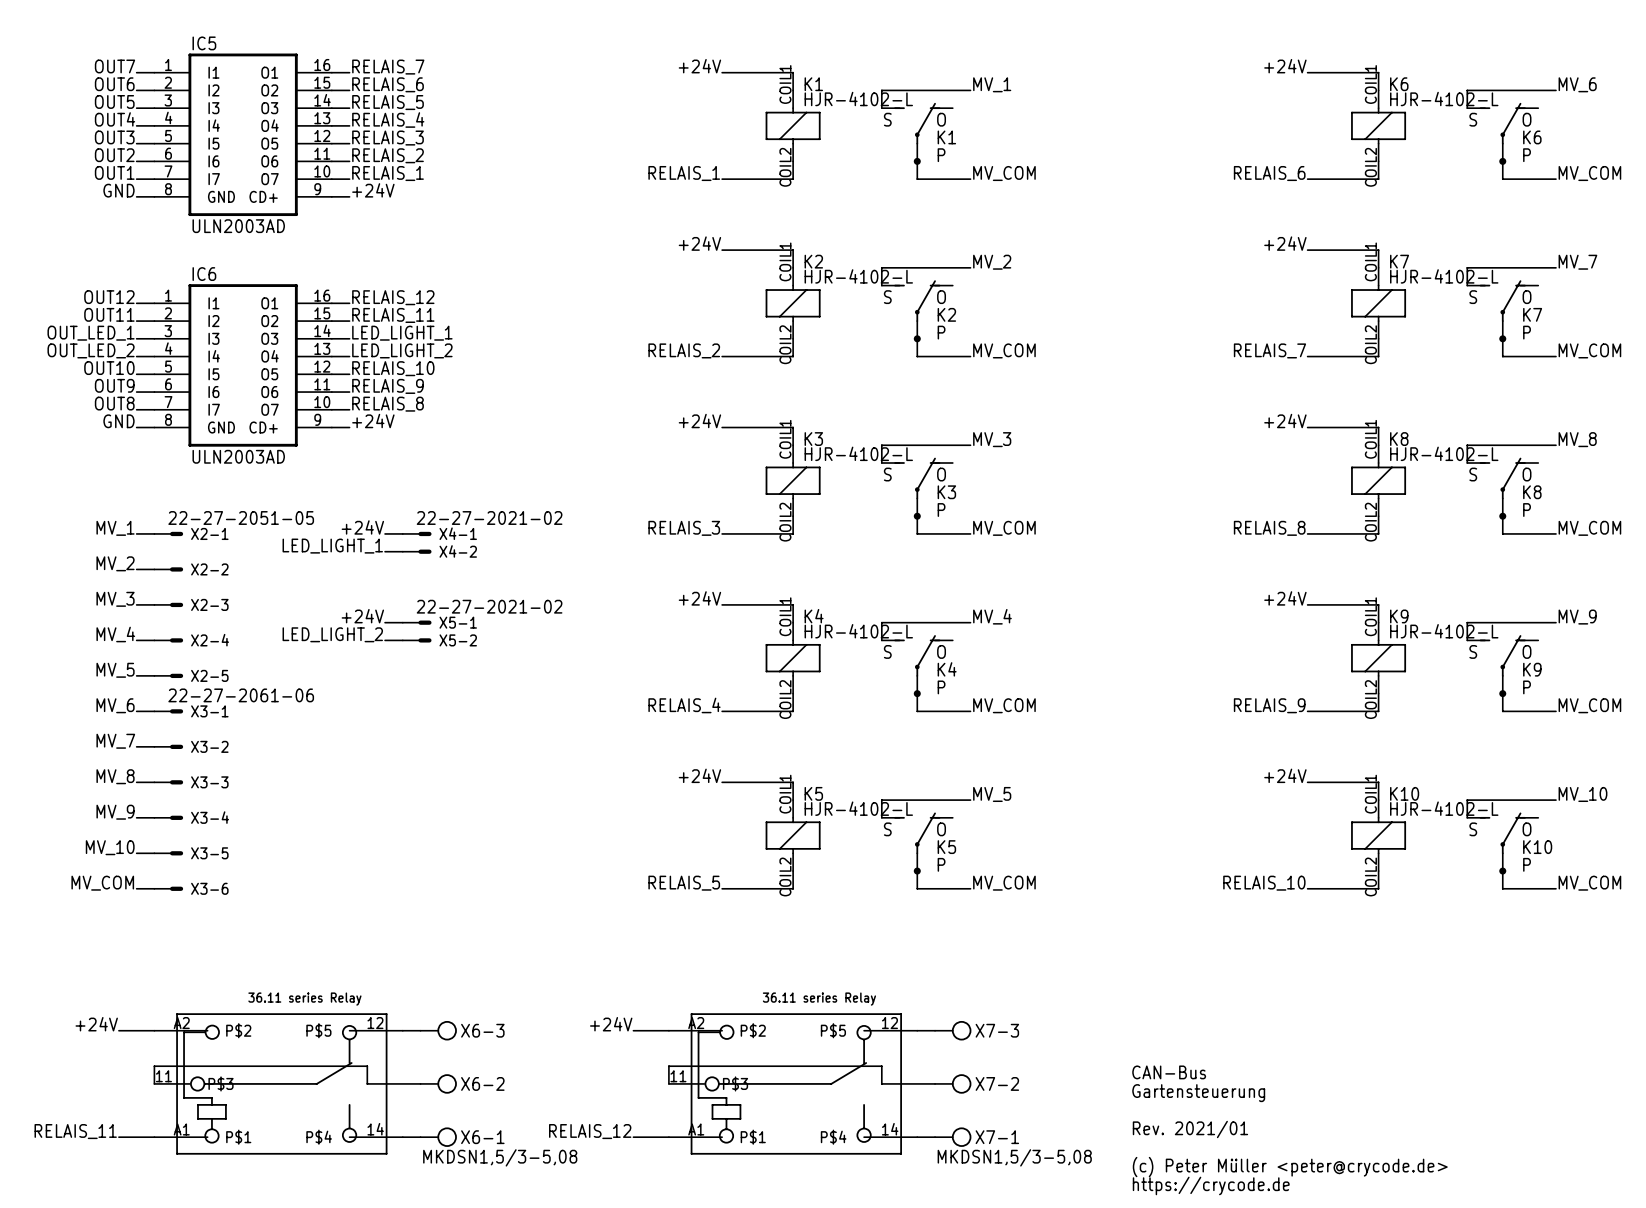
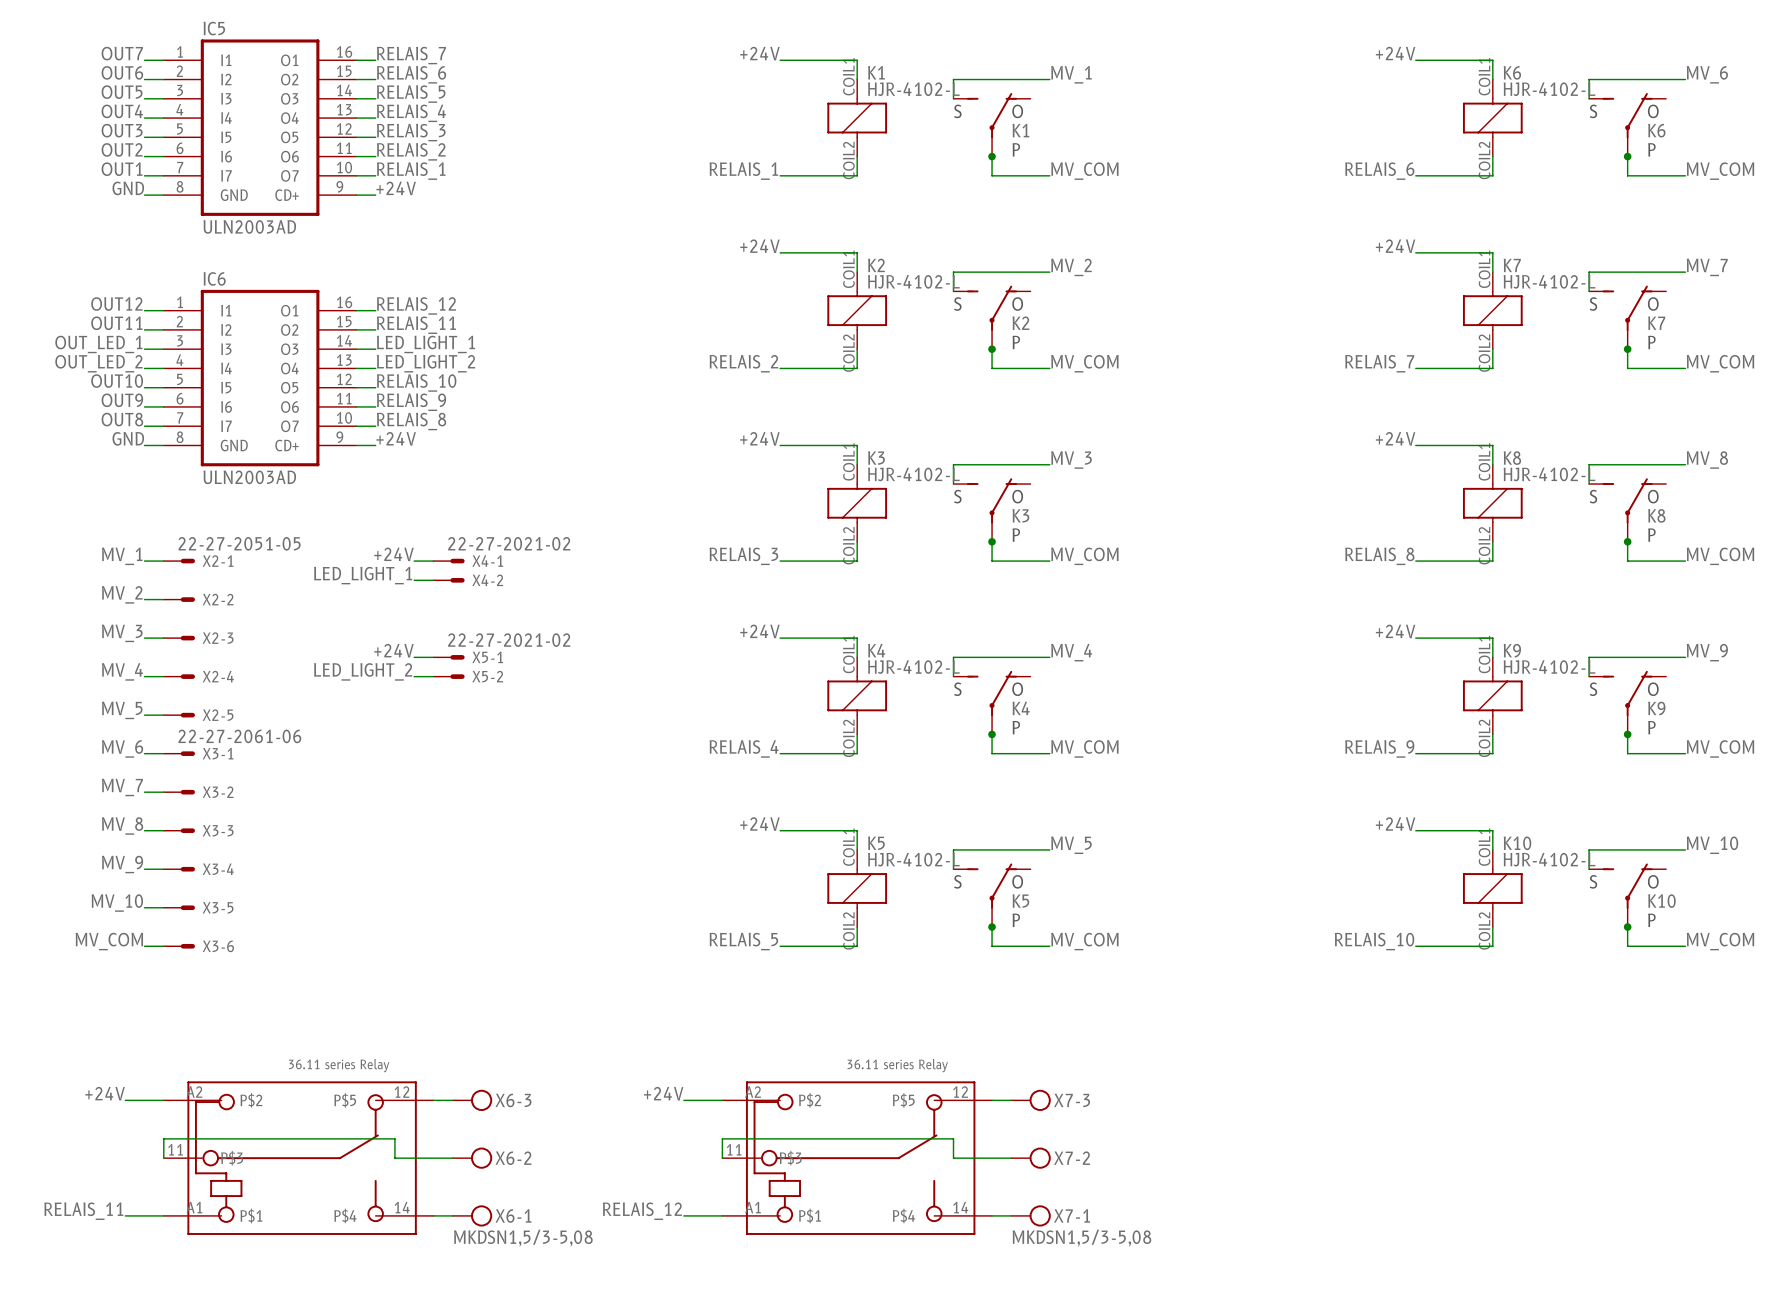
text: CAN-Bus (1169, 1072) -> none
text: Gartensteuerung (1198, 1093) -> none
text: Rev. 2021/01 (1190, 1129) -> none
text: (c) Peter Müller <peter@crycode.de> (1290, 1167) -> none
text: https://crycode.de (1211, 1185) -> none

